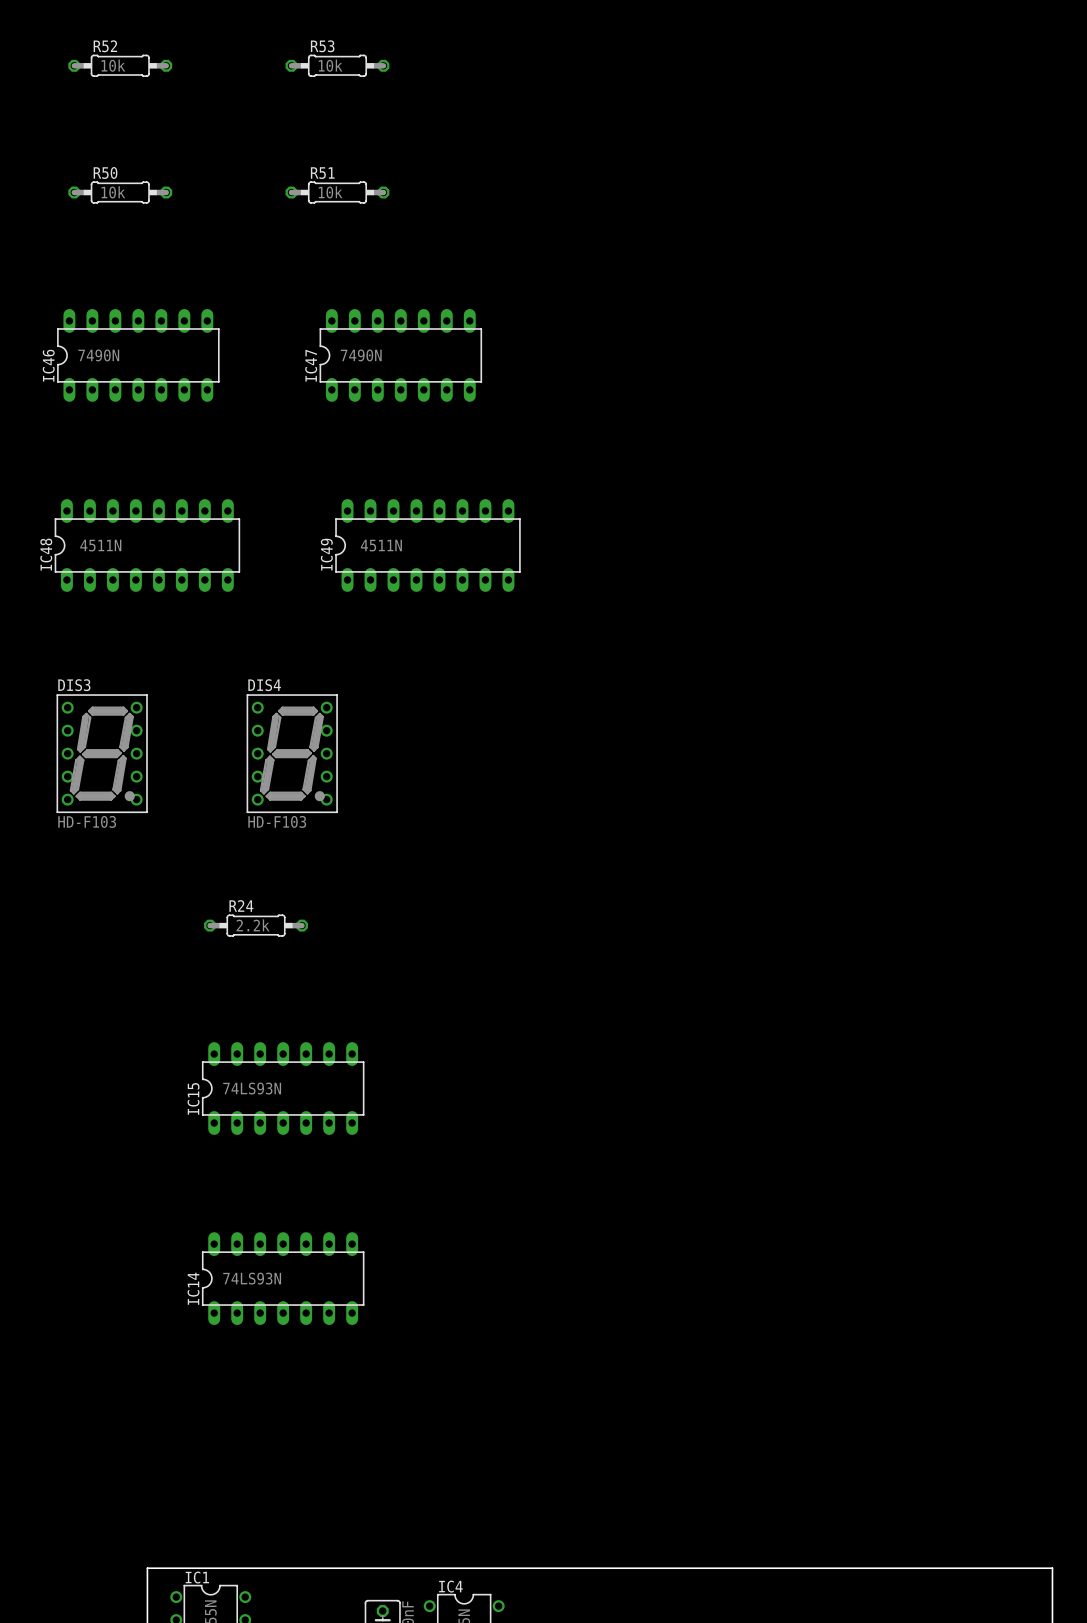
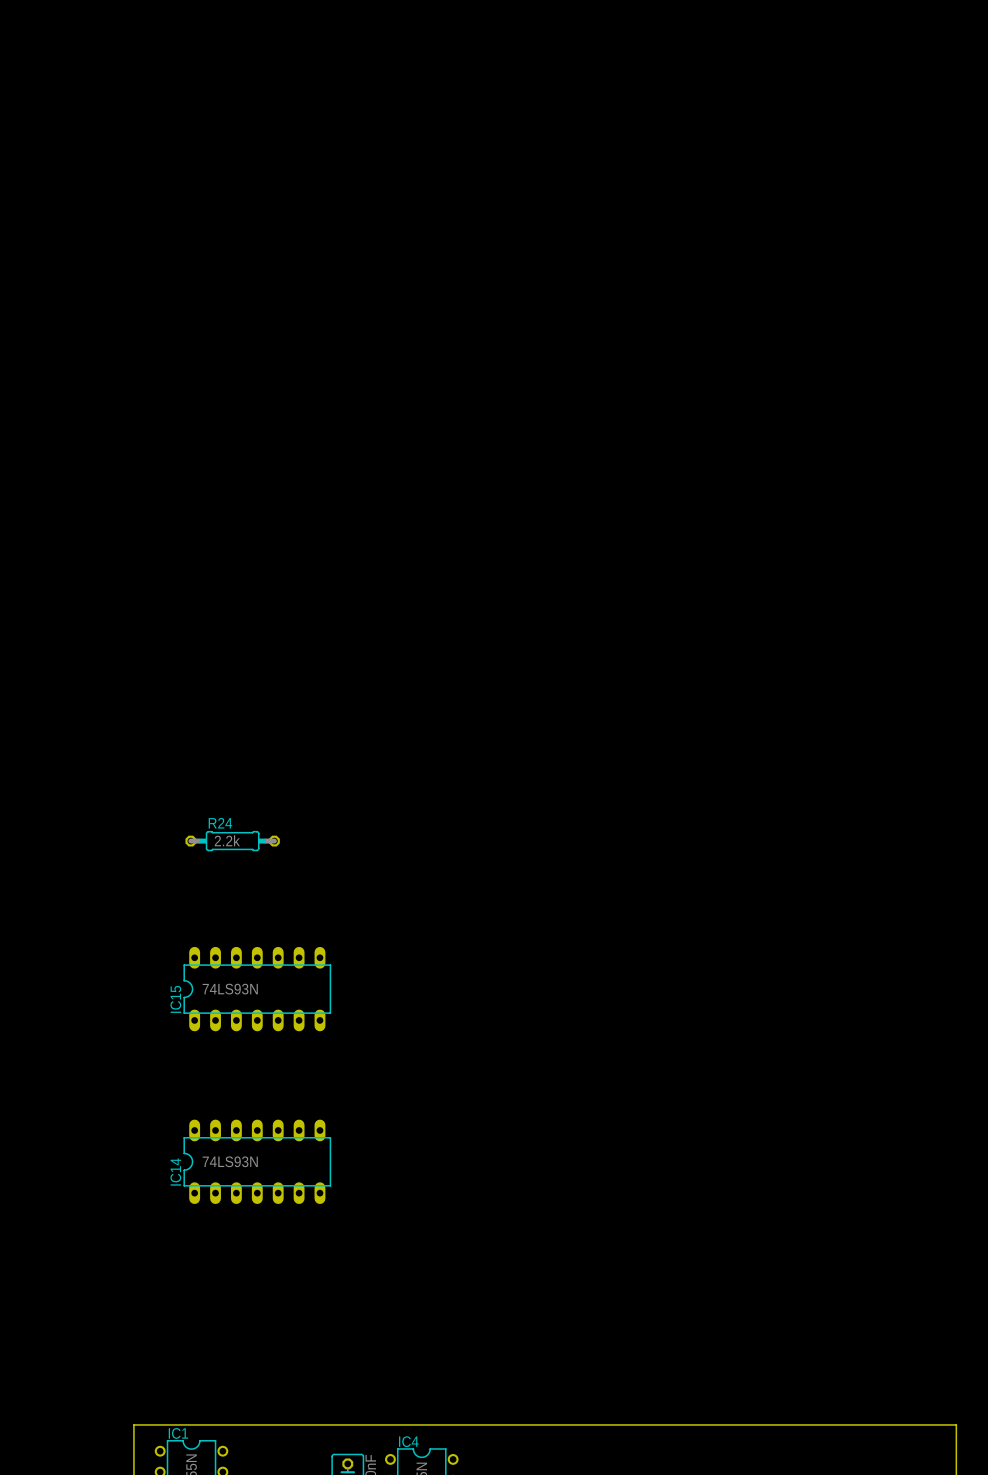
R52: 10k (120, 65) -> none
R53: 10k (337, 65) -> none
R50: 10k (120, 192) -> none
R51: 10k (337, 192) -> none
IC46: 7490N (138, 355) -> none
IC47: 7490N (400, 355) -> none
IC48: 4511N (147, 545) -> none
IC49: 4511N (427, 545) -> none
DIS3: HD-F103 (102, 753) -> none
DIS4: HD-F103 (292, 753) -> none

